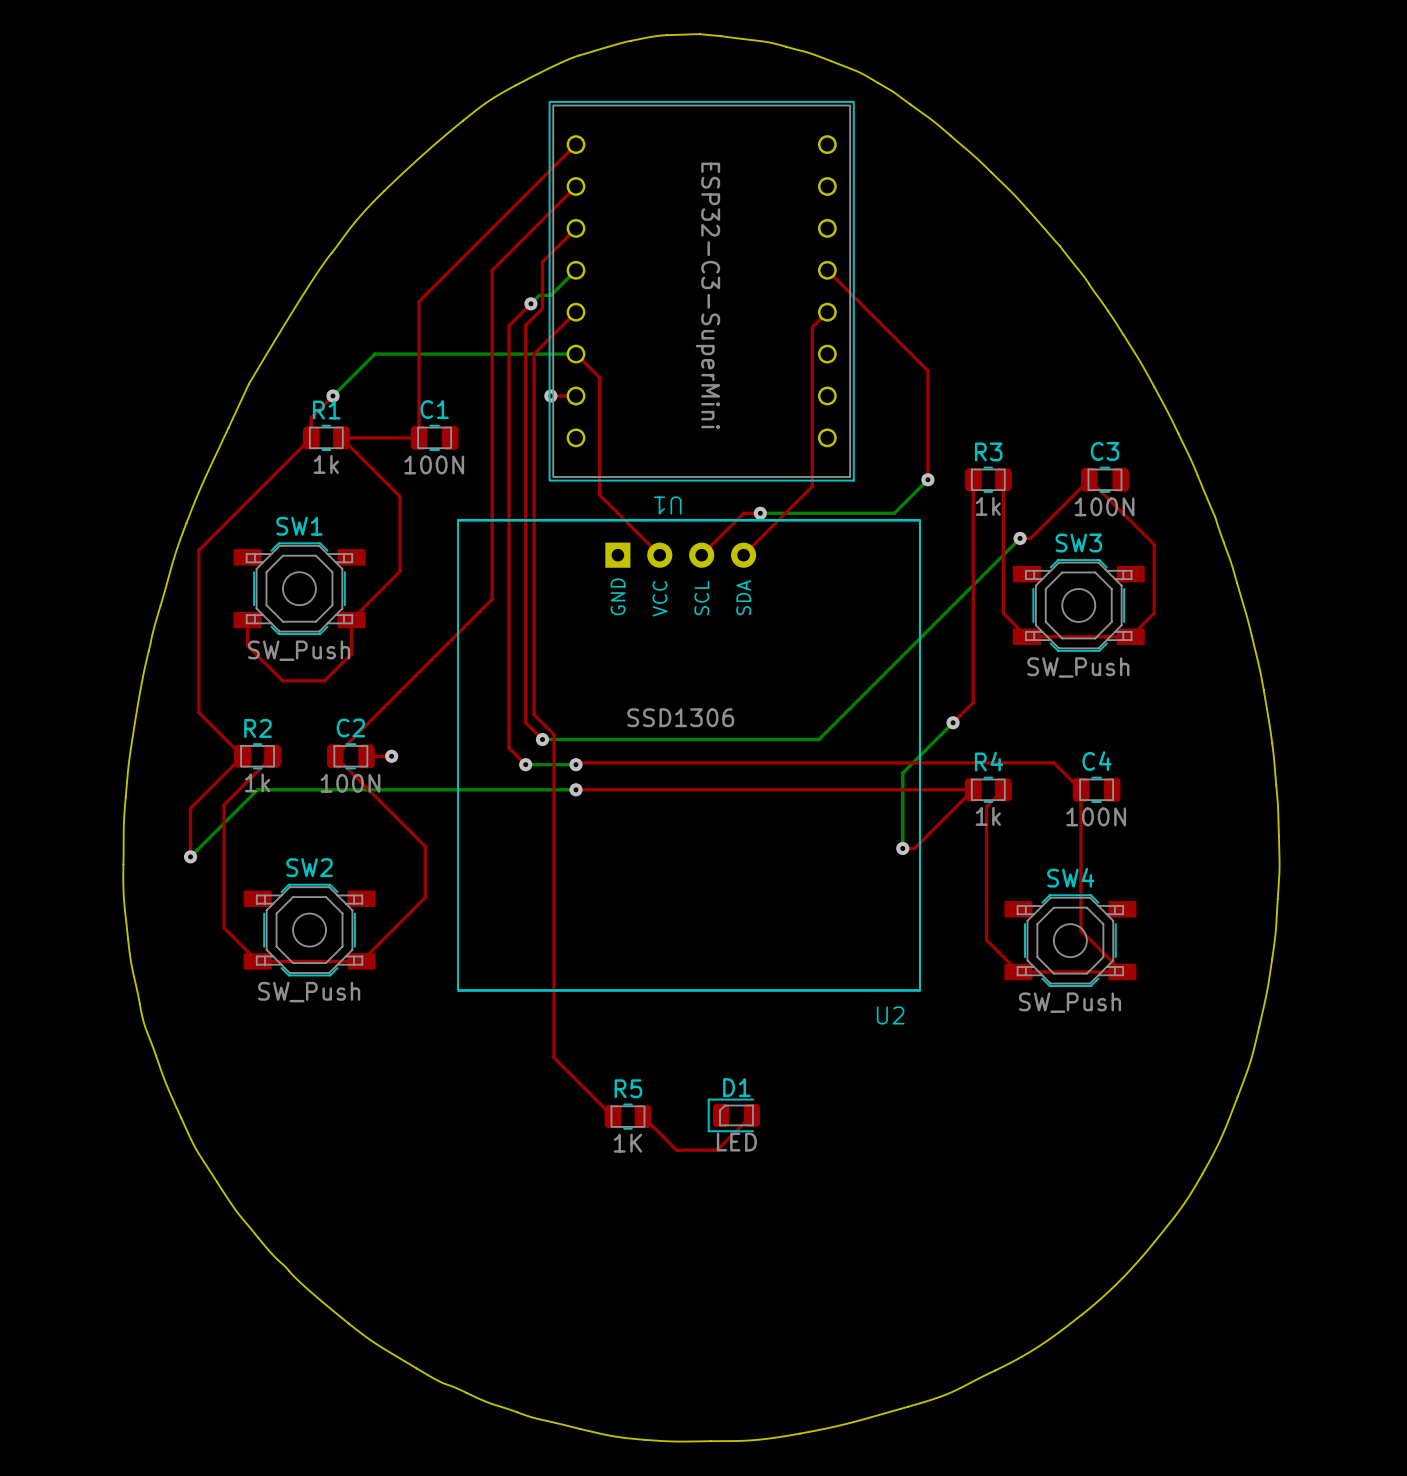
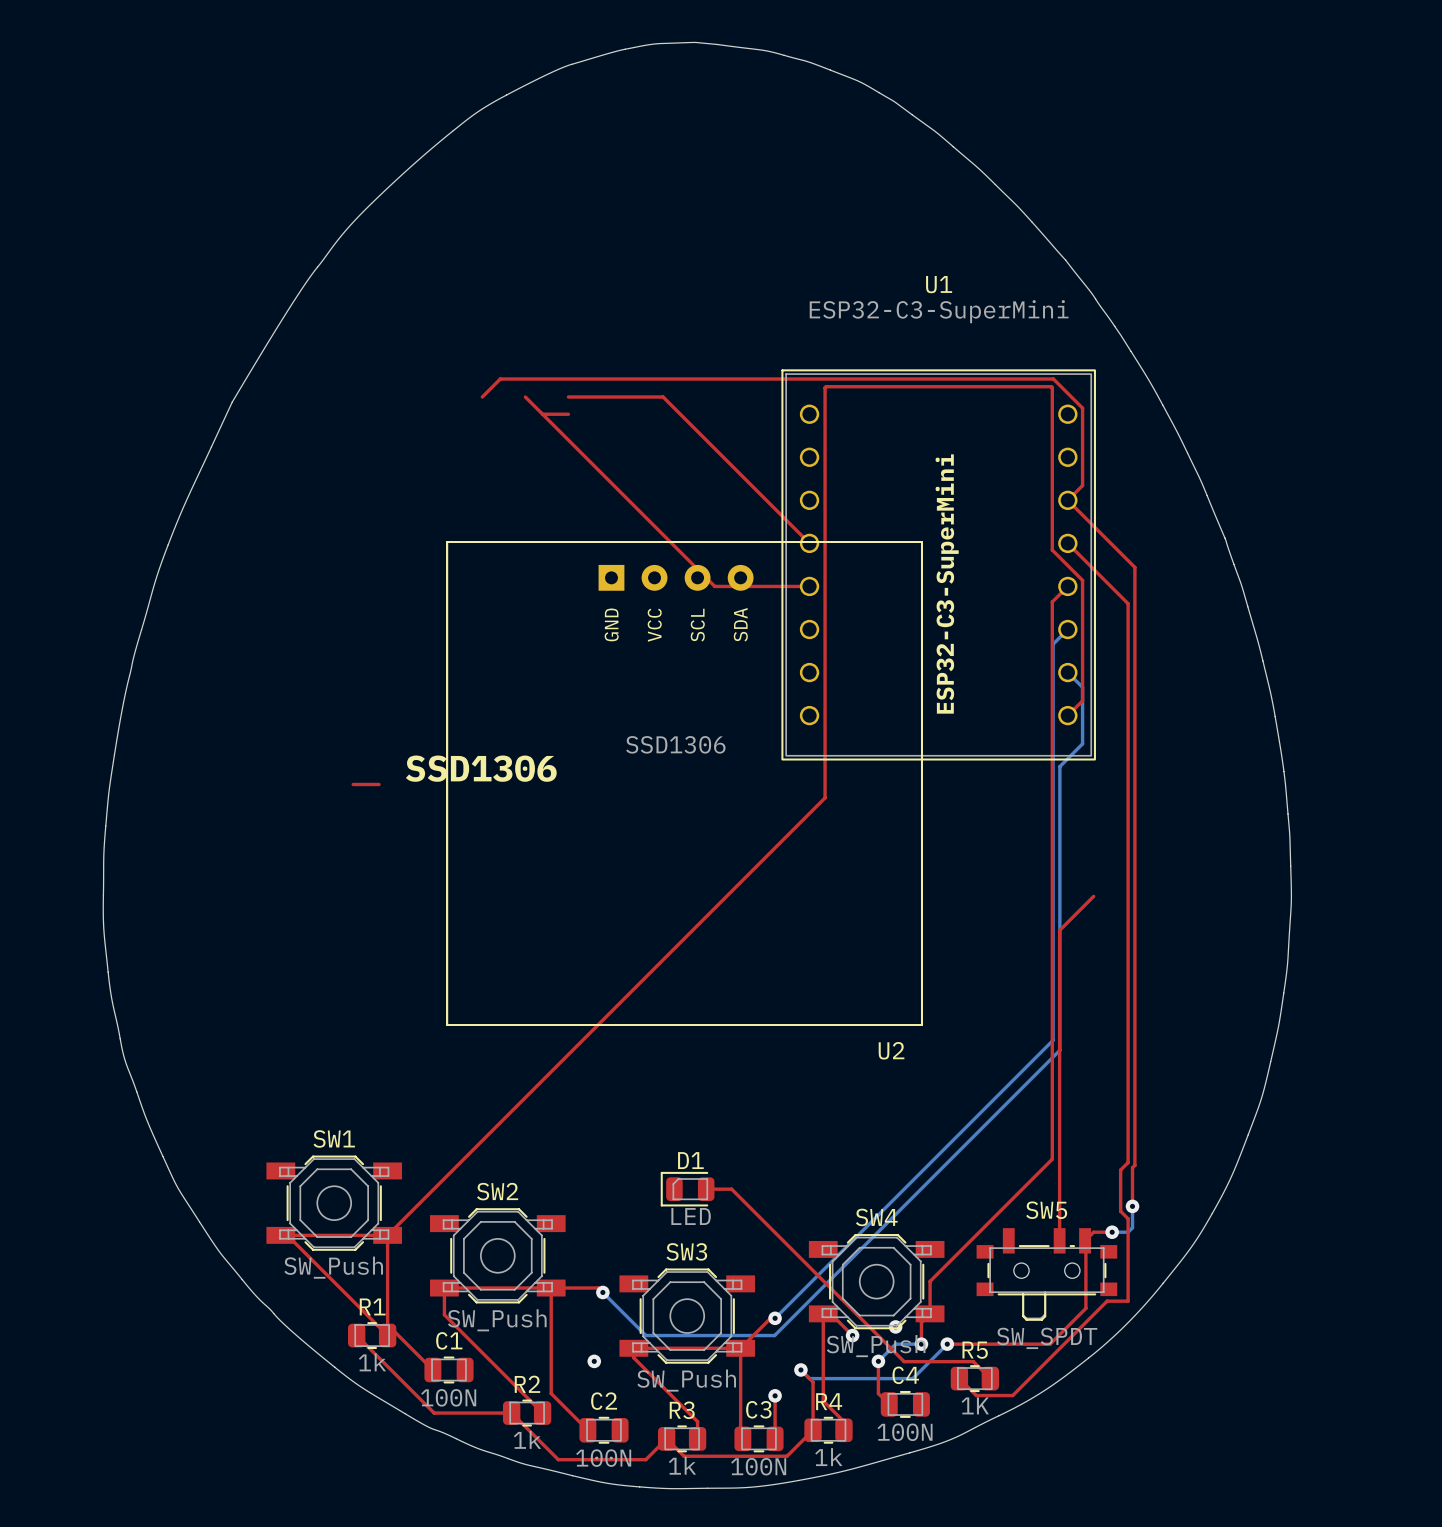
top track: (575, 144) (418, 301) (418, 437) (341, 437) (400, 496) (400, 571) (351, 620) (351, 654) (324, 680) (282, 680) (247, 645) (247, 620) -> none
top track: (575, 186) (492, 270) (492, 599) (335, 756) (425, 846) (425, 897) (361, 961) (257, 961) (224, 927) (224, 804) (272, 756) -> none
top track: (575, 228) (542, 261) (542, 308) (525, 325) (525, 722) (542, 739) -> none
bottom track: (575, 270) (550, 295) (539, 295) (530, 303) -> none
top track: (827, 270) (927, 370) (927, 479) -> none
U1 position: (701, 291) -> (938, 564)
U1 value rotation: 0° (707, 295) -> 90° counterclockwise (939, 311)
top track: (530, 303) (508, 325) (508, 747) (525, 764) -> none
via: (530, 303) -> none
top track: (575, 312) (534, 354) (534, 714) (554, 734) (554, 1057) (612, 1116) -> none
top track: (827, 312) (812, 327) (812, 486) (743, 555) -> none
top track: (575, 354) (599, 377) (599, 494) (659, 555) -> none
bottom track: (575, 354) (374, 354) (332, 395) -> none
top track: none -> (482, 397) (500, 379) (1053, 379) (1082, 408) (1082, 485) (1067, 500) (1134, 567) (1134, 1165) (1132, 1167) (1132, 1206)
top track: none -> (525, 397) (714, 586) (809, 586)
top track: none -> (568, 397) (663, 397) (809, 543)
top track: (332, 395) (311, 417) (311, 437) (198, 550) (198, 712) (242, 756) (190, 808) (190, 856) -> none
via: (332, 395) -> none
via: (550, 395) -> none
R1 position: (326, 437) -> (372, 1335)
C1 position: (434, 437) -> (449, 1369)
bottom track: (927, 479) (894, 513) (760, 513) -> none
via: (927, 479) -> none
top track: (973, 479) (973, 702) (953, 722) -> none
R3 position: (988, 479) -> (682, 1438)
top track: (1003, 479) (1003, 613) (1026, 636) (1130, 636) (1154, 613) (1154, 544) (1089, 479) (1030, 538) (1020, 538) -> none
C3 position: (1104, 479) -> (758, 1438)
U1 name rotation: 0° (667, 505) -> 180° (939, 284)
U1 name position: U1 (667, 505) -> U1 (939, 284)
top track: (760, 513) (743, 513) (701, 555) -> none
via: (760, 513) -> none
top track: none -> (1067, 543) (1128, 603) (1128, 1162) (1120, 1170) (1120, 1211) (1128, 1218) (1128, 1301) (1107, 1301) (1012, 1395) (976, 1395) (959, 1378)
bottom track: (1020, 538) (818, 739) (542, 739) -> none
via: (1020, 538) -> none
text: none -> ESP32-C3-SuperMini (947, 584)
top track: none -> (1067, 586) (1052, 601) (1052, 1159) (930, 1281) (930, 1313) (921, 1322) (921, 1344)
SW1 position: (299, 588) -> (334, 1203)
bottom track: none -> (1067, 629) (1053, 644) (1053, 1040) (775, 1318)
SW3 position: (1078, 605) -> (687, 1316)
bottom track: none -> (1067, 672) (1082, 687) (1082, 743) (1059, 766) (1059, 1050) (774, 1335) (645, 1335) (602, 1292)
top track: none -> (1067, 715) (1082, 700) (1082, 580) (1052, 550) (1052, 387) (826, 386) (825, 797) (387, 1235)
bottom track: (953, 722) (902, 773) (902, 848) -> none
via: (953, 722) -> none
via: (542, 739) -> none
text: none -> SSD1306 (481, 768)
R2 position: (257, 756) -> (527, 1413)
C2 position: (350, 756) -> (603, 1430)
via: (391, 756) -> none
bottom track: (525, 764) (575, 764) -> none
via: (525, 764) -> none
top track: (575, 764) (577, 762) (1054, 762) (1080, 789) (1080, 930) (1122, 971) (1018, 971) (986, 940) (986, 806) (1003, 789) -> none
via: (575, 764) -> none
top track: (575, 789) (973, 789) (914, 848) (902, 848) -> none
bottom track: (575, 789) (257, 789) (190, 856) -> none
via: (575, 789) -> none
R4 position: (988, 789) -> (828, 1430)
C4 position: (1096, 789) -> (905, 1404)
via: (902, 848) -> none
via: (190, 856) -> none
top track: none -> (1093, 896) (1059, 930) (1059, 1240)
SW2 position: (309, 930) -> (497, 1255)
SW4 position: (1070, 940) -> (876, 1281)
D1 position: (733, 1115) -> (687, 1189)
top track: (751, 1115) (717, 1150) -> (990, 1378) (973, 1361) (904, 1361) (731, 1189) (713, 1189)
R5 position: (627, 1116) -> (974, 1378)
top track: (643, 1116) (676, 1150) (710, 1150) -> none
bottom track: none -> (1132, 1206) (1132, 1227) (1128, 1232) (1112, 1232)
via: none -> (1132, 1206)
top track: none -> (1112, 1232) (1093, 1232) (1085, 1240) (1085, 1308) (1050, 1344) (947, 1344)
via: none -> (1112, 1232)
top track: none -> (280, 1235) (387, 1235)
top track: none -> (287, 1235) (387, 1335)
top track: none -> (387, 1235) (387, 1324) (432, 1369)
SW5: none -> SW_SPDT (1046, 1274)
top track: none -> (551, 1288) (551, 1393) (587, 1430)
top track: none -> (602, 1292) (598, 1288) (444, 1288) (444, 1314) (542, 1413)
via: none -> (602, 1292)
top track: none -> (775, 1318) (770, 1318) (740, 1348)
via: none -> (775, 1318)
via: none -> (895, 1326)
top track: none -> (356, 1335) (434, 1413) (511, 1413) (558, 1459) (645, 1459) (666, 1438) (684, 1456) (787, 1456) (813, 1430) (813, 1382) (800, 1369)
top track: none -> (852, 1335) (830, 1313) (823, 1313) (823, 1400) (843, 1421) (843, 1430)
via: none -> (852, 1335)
bottom track: none -> (921, 1344) (895, 1344) (878, 1361)
via: none -> (921, 1344)
bottom track: none -> (947, 1344) (912, 1378) (809, 1378) (800, 1369)
via: none -> (947, 1344)
top track: none -> (740, 1348) (633, 1348) (633, 1357) (697, 1421) (697, 1438)
top track: none -> (740, 1348) (740, 1436) (742, 1438)
via: none -> (594, 1361)
top track: none -> (878, 1361) (878, 1393) (889, 1404)
via: none -> (878, 1361)
via: none -> (800, 1369)
top track: none -> (775, 1395) (775, 1438)
via: none -> (775, 1395)

